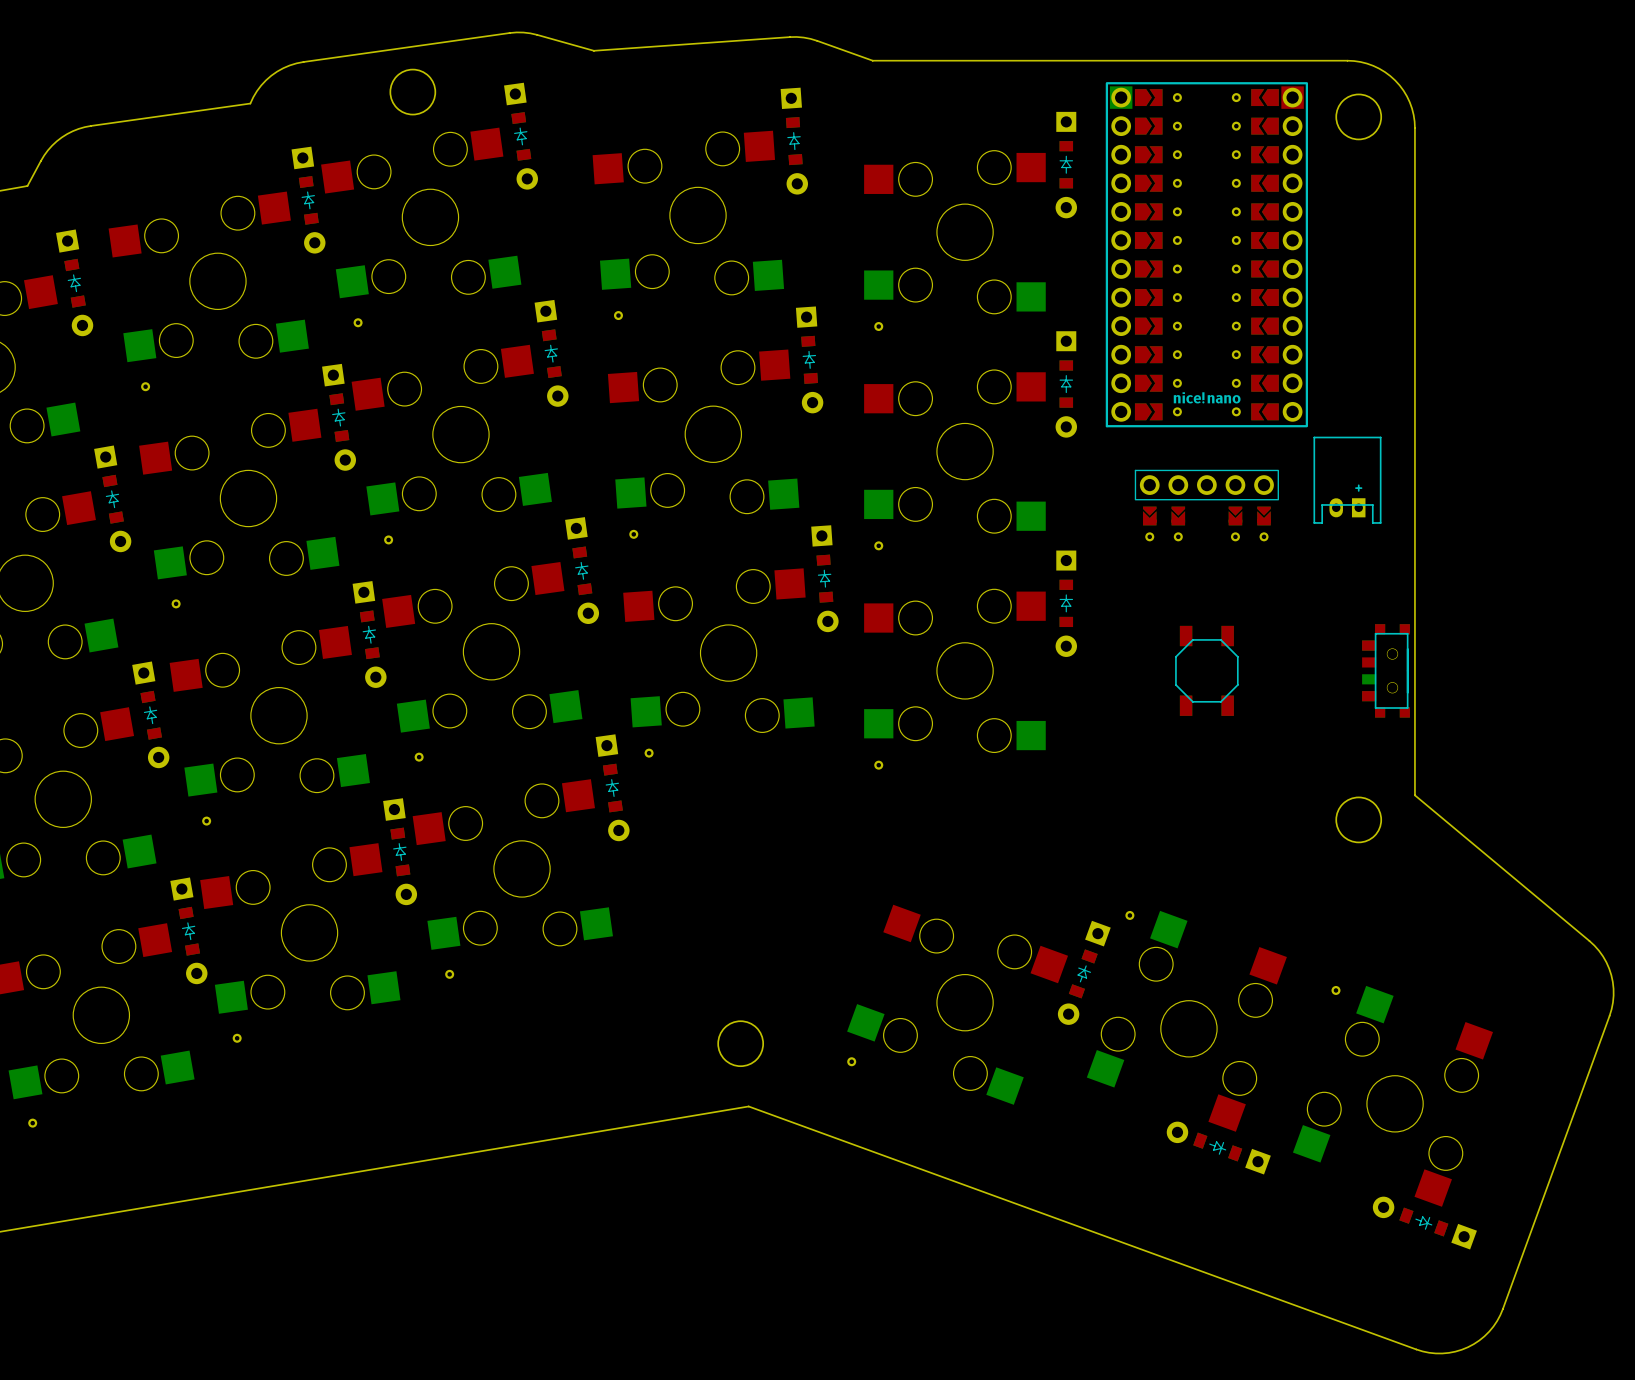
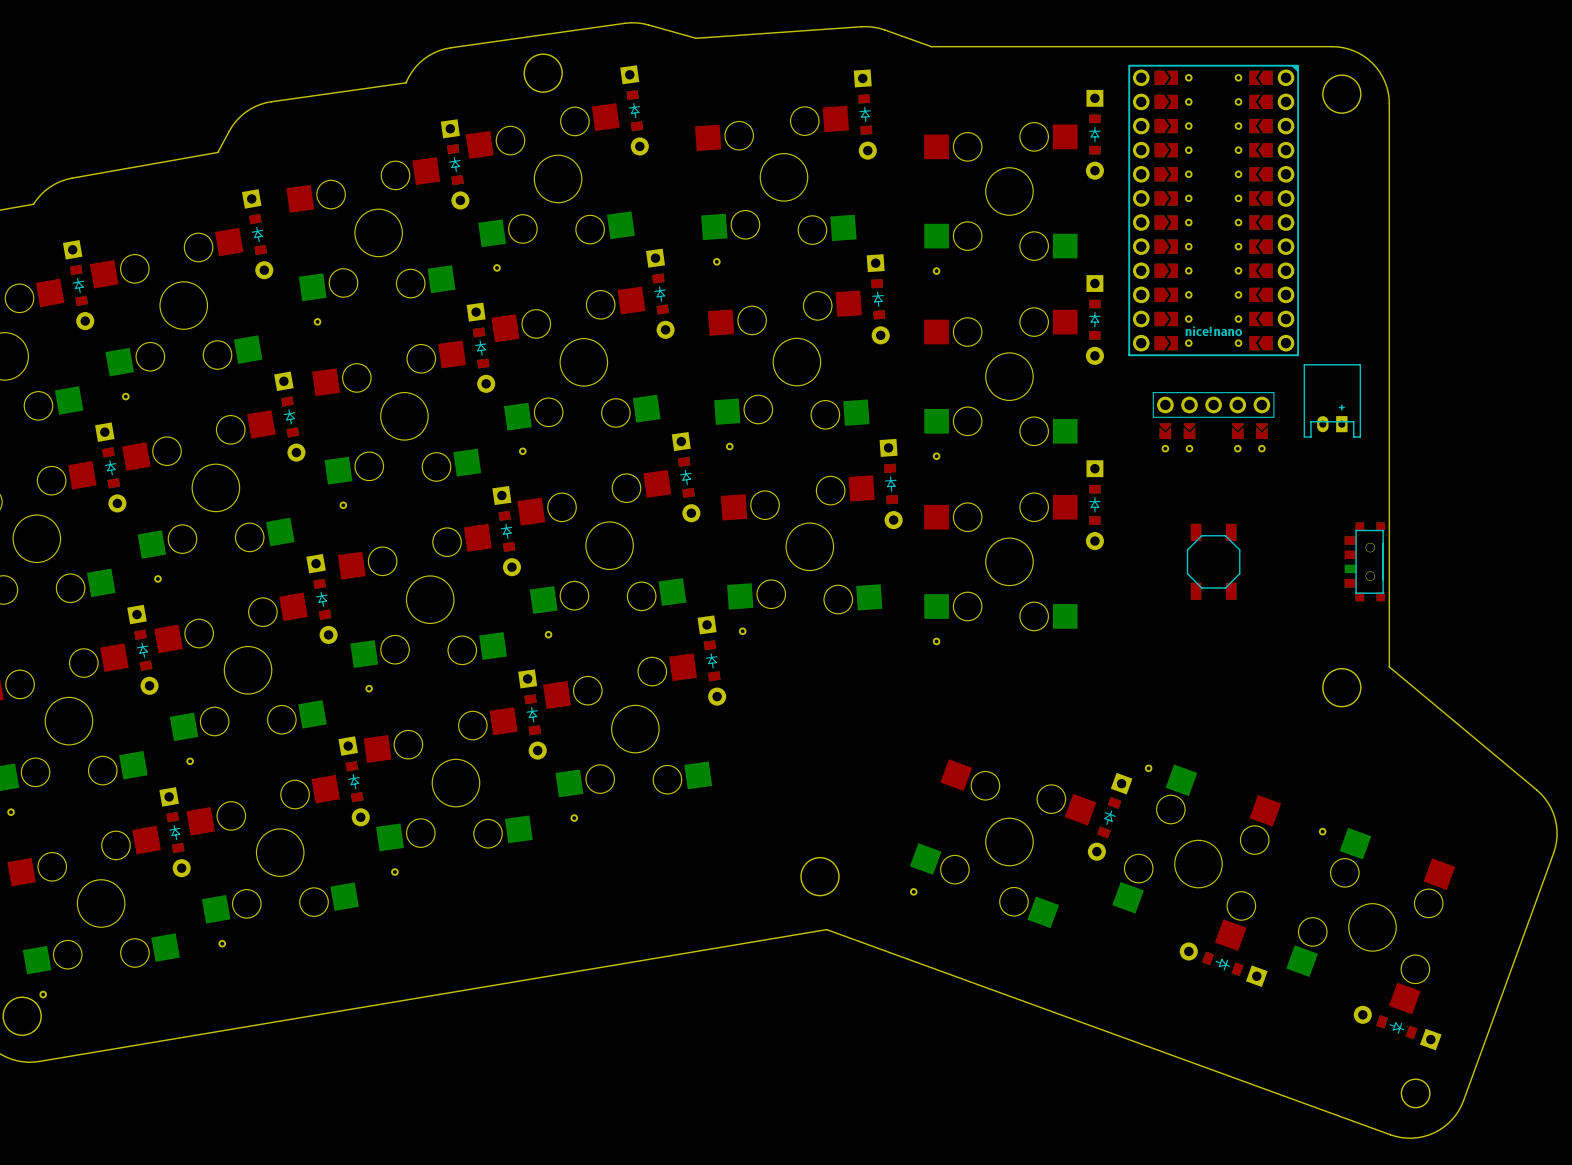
part footprint: [1105, 82, 1309, 428] -> [1128, 64, 1300, 357]
round board edge: none -> [1400, 1078, 1431, 1109]

